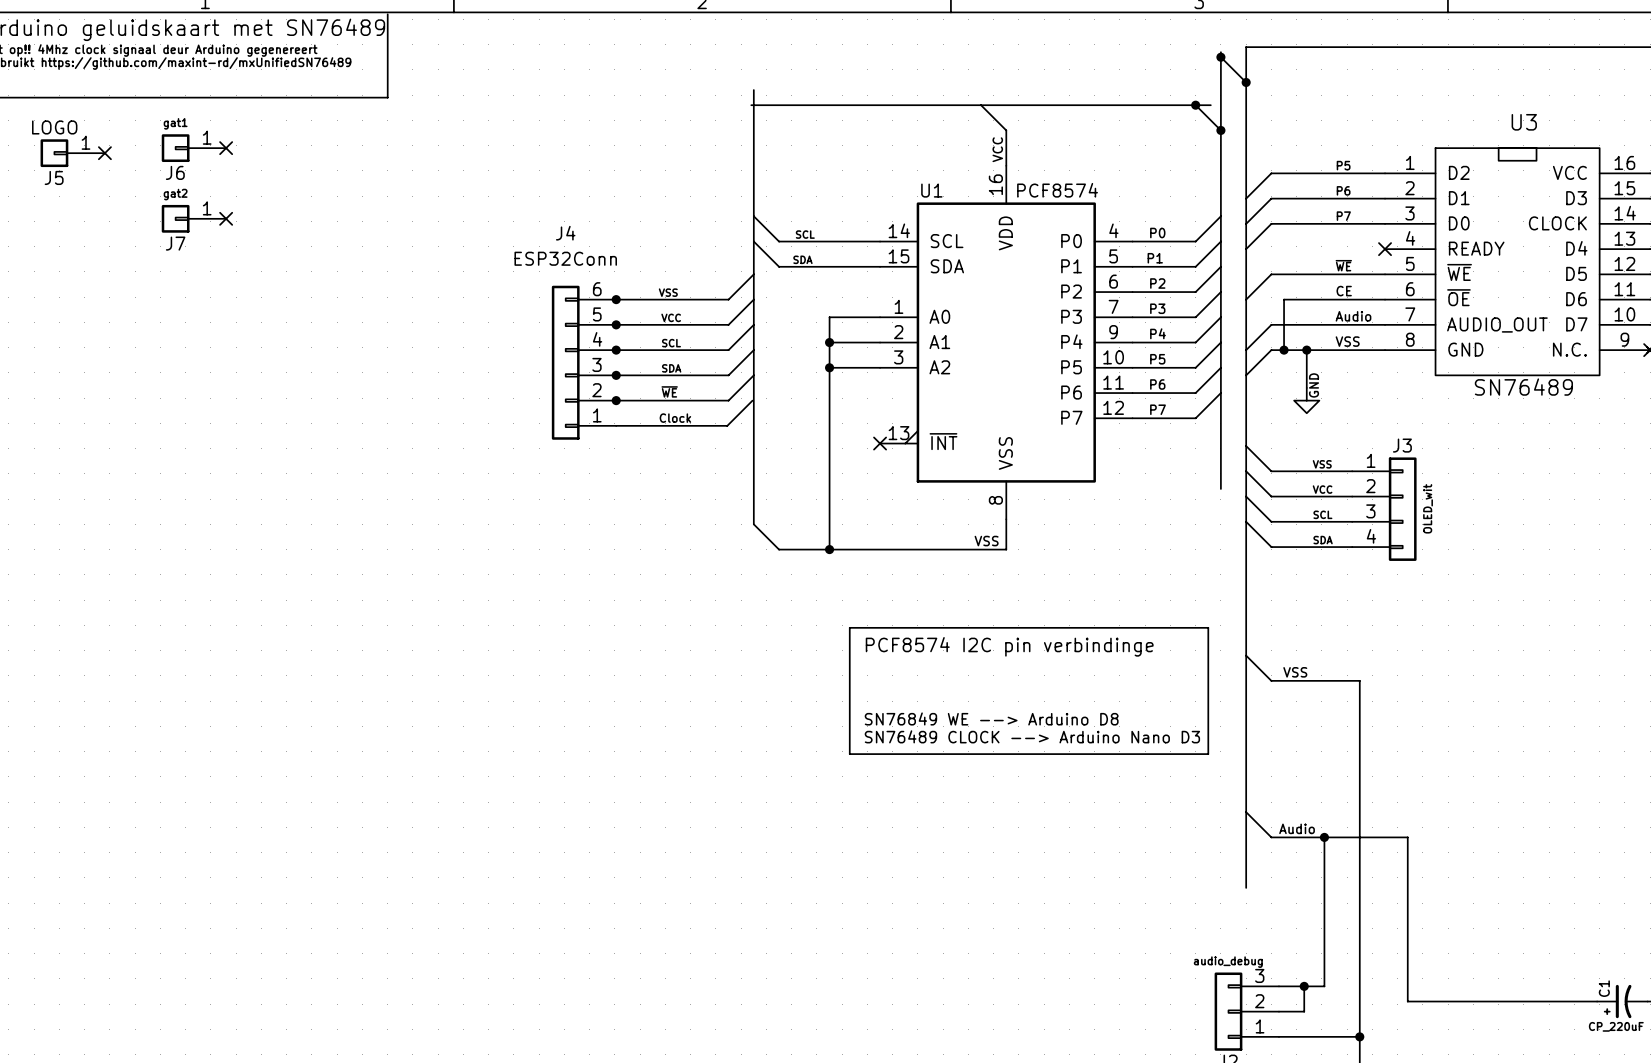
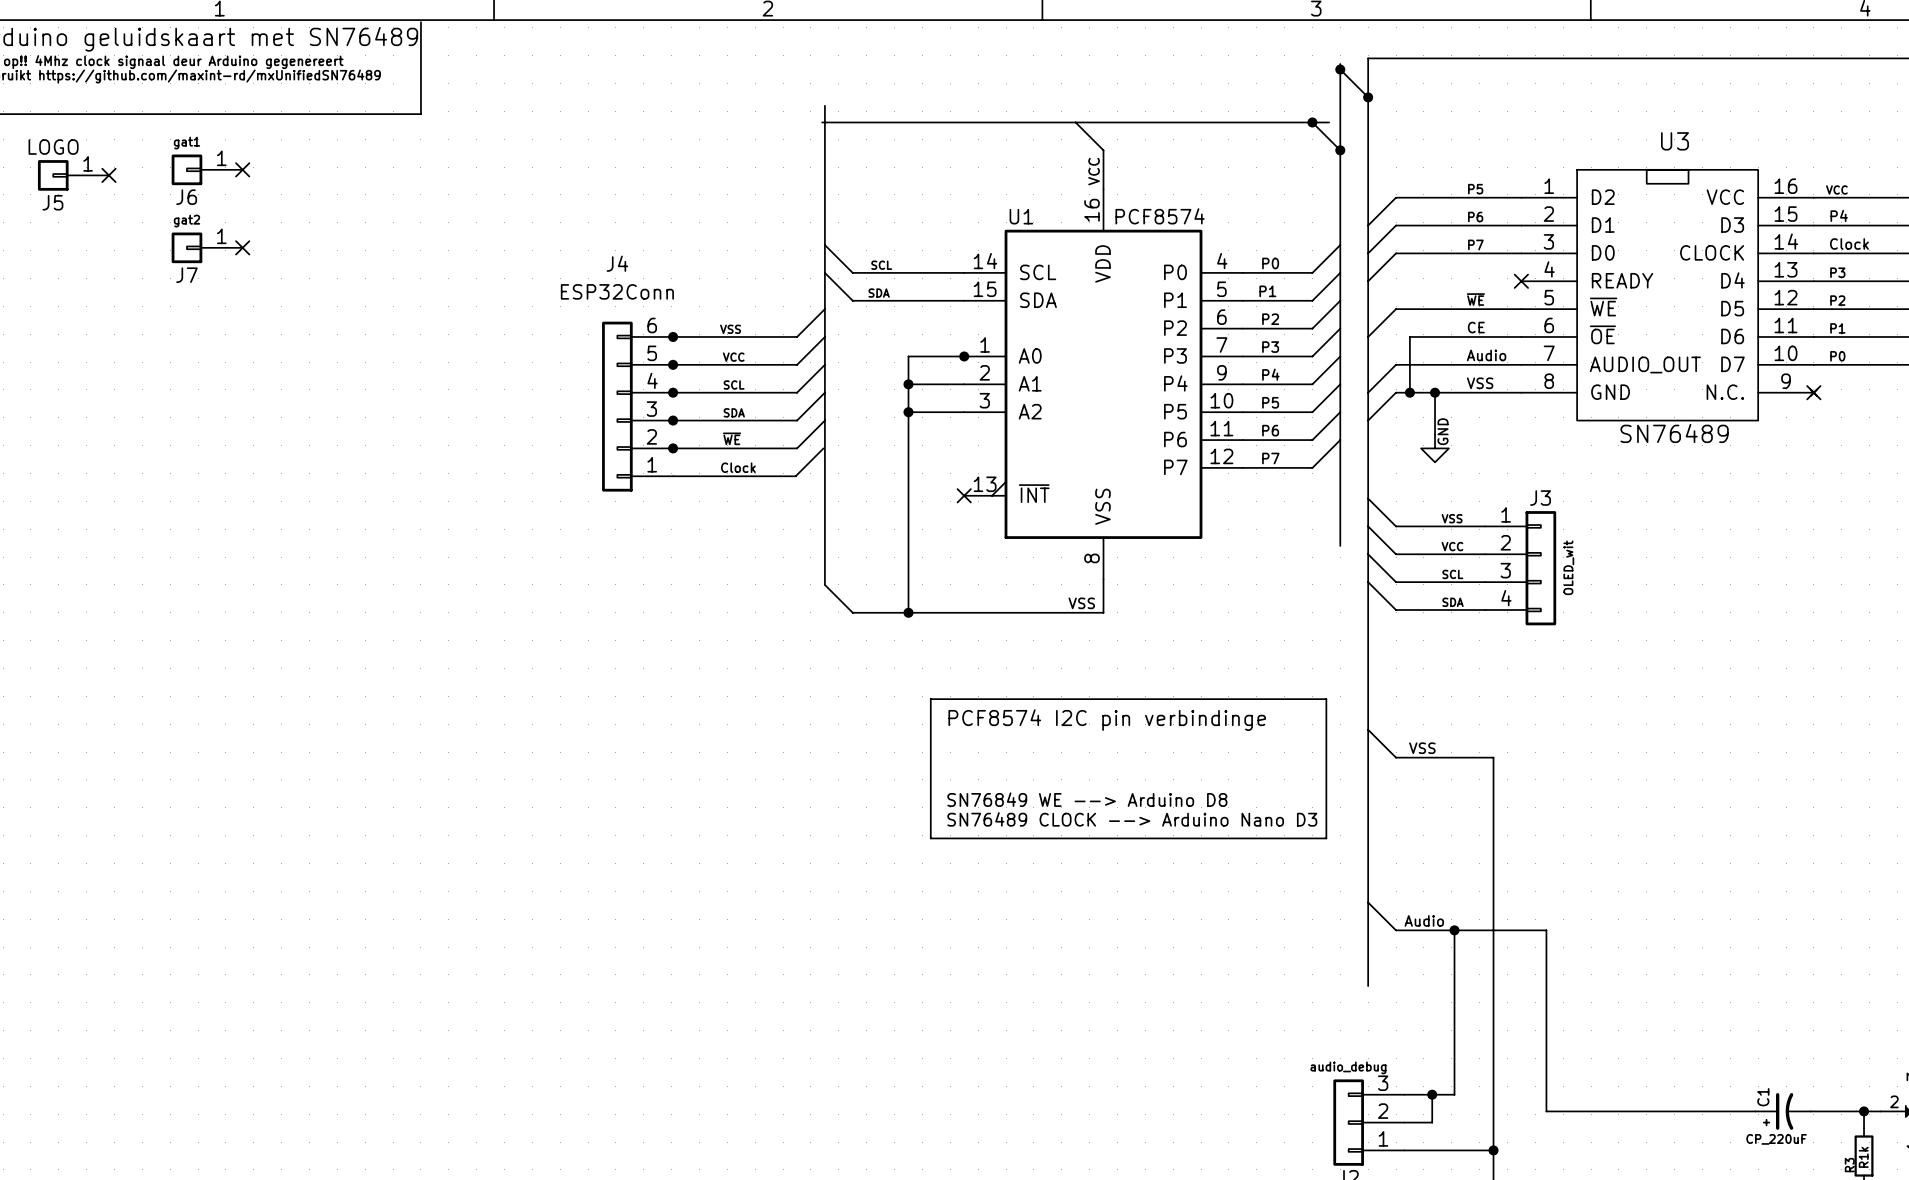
junction: none -> (964, 356)

